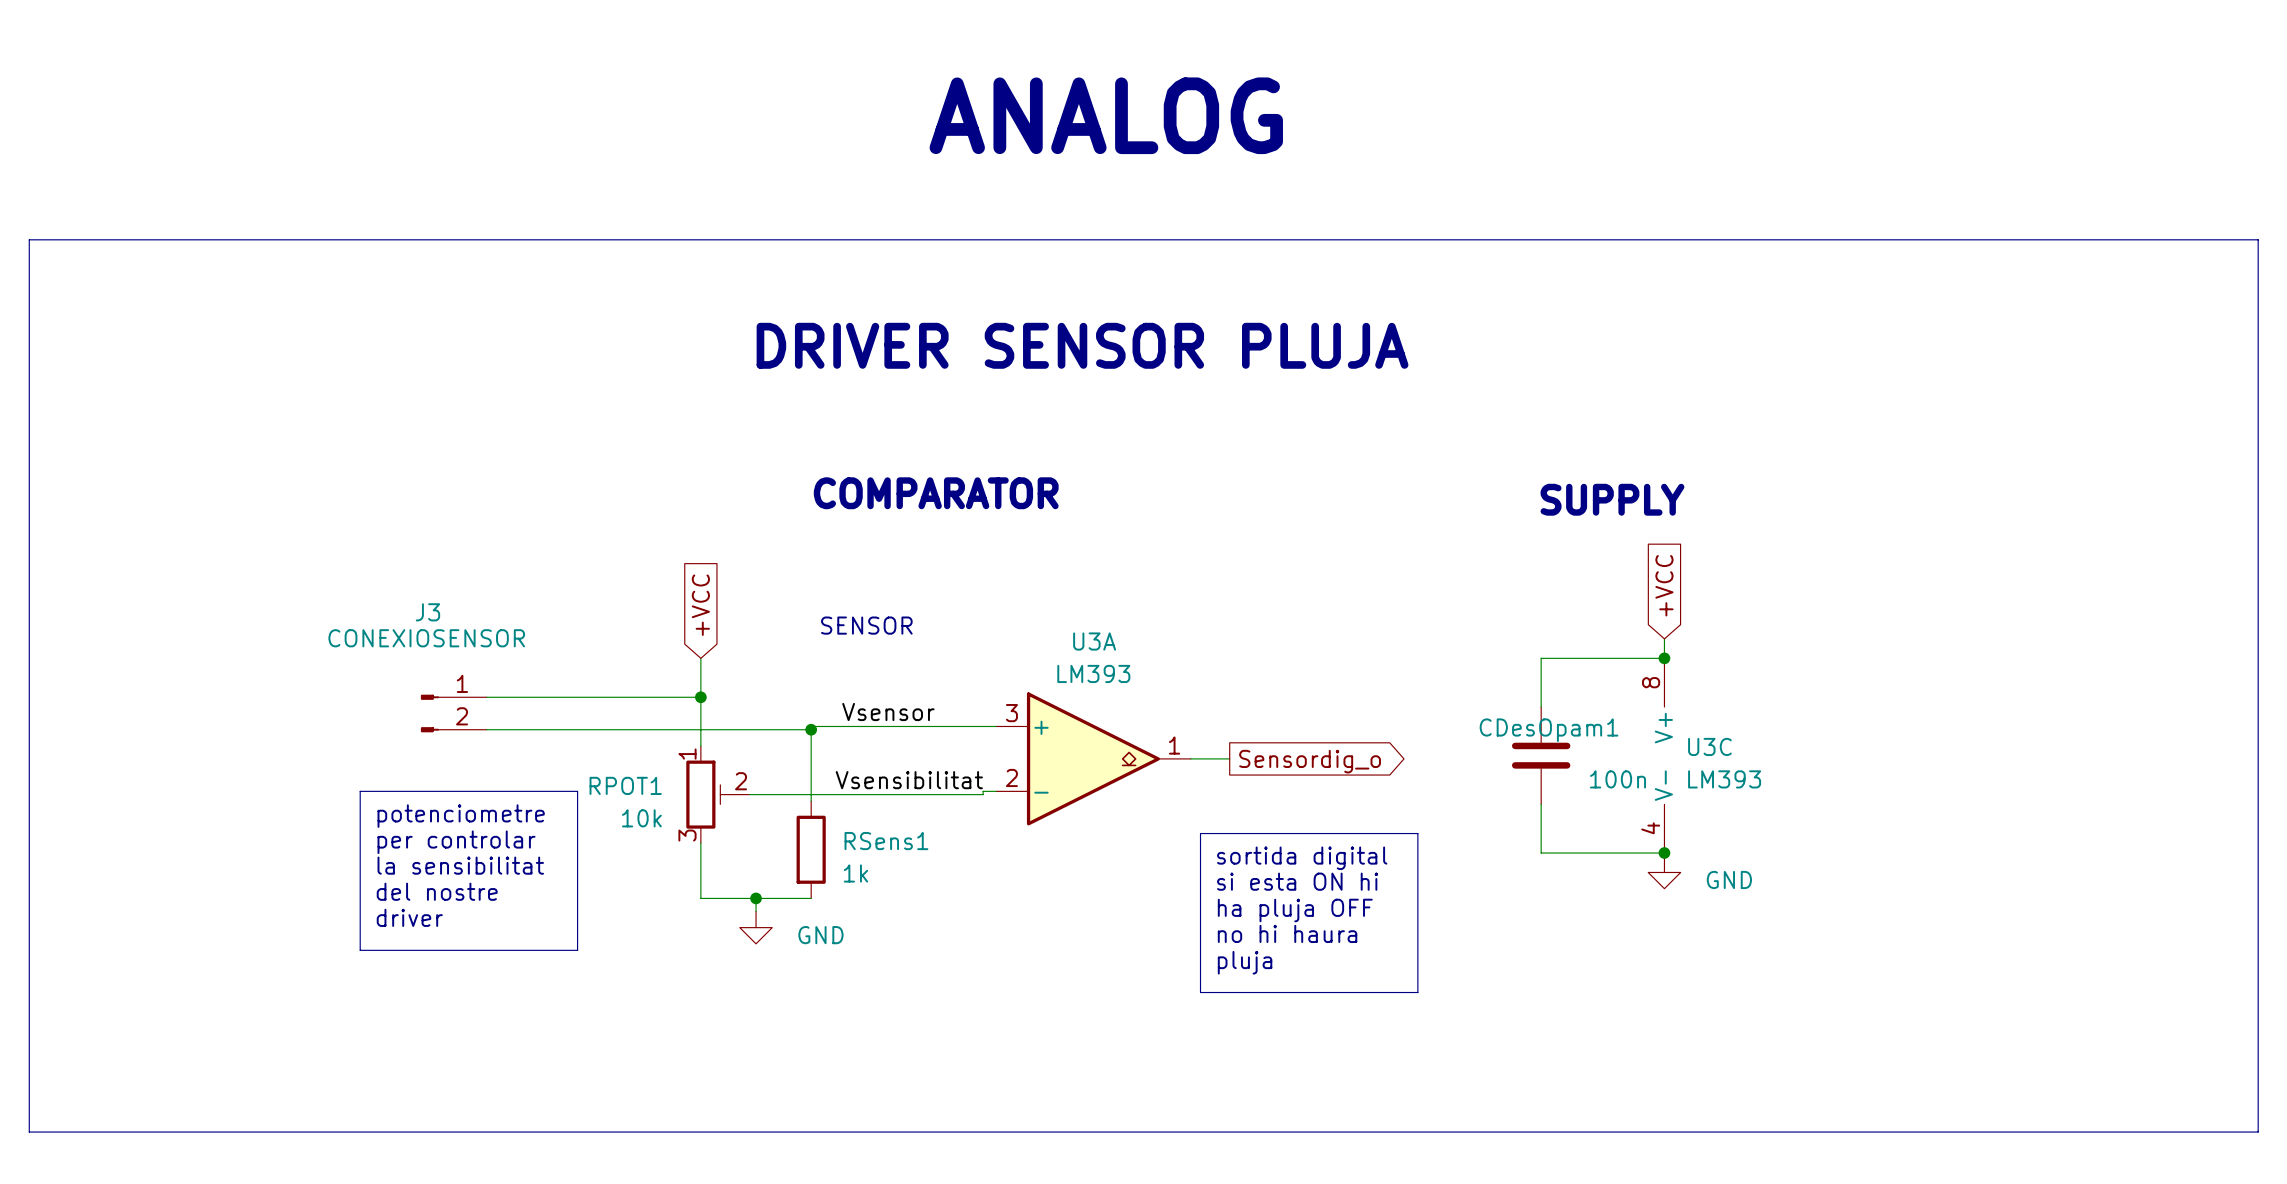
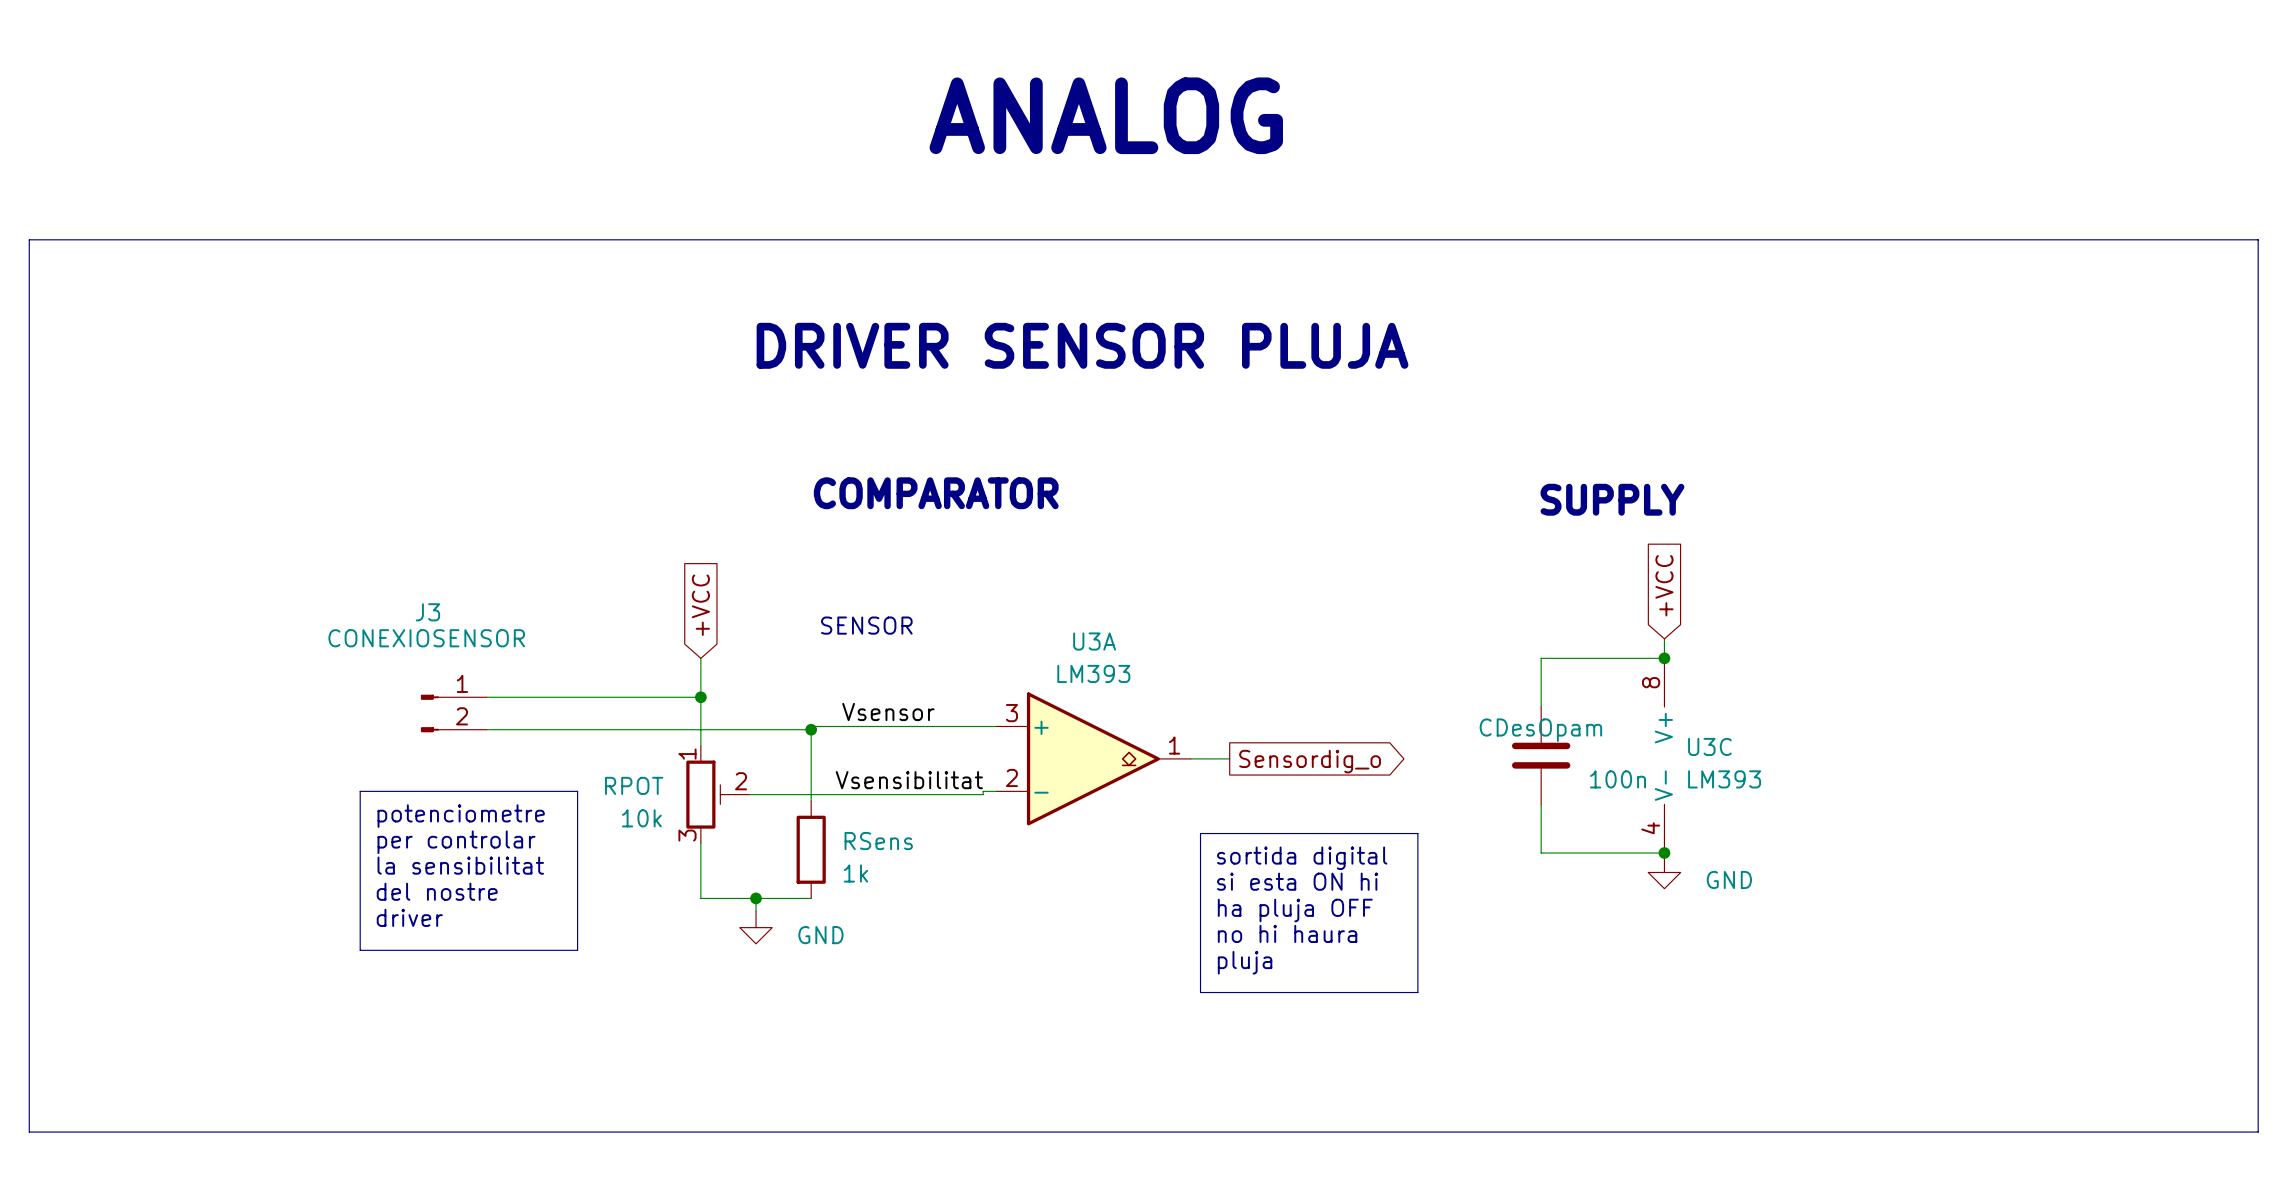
CDesOpam1 name: CDesOpam1 (1549, 730) -> CDesOpam (1540, 730)
RPOT1 name: RPOT1 (625, 785) -> RPOT (634, 785)
RSens1 name: RSens1 (886, 841) -> RSens (878, 841)

